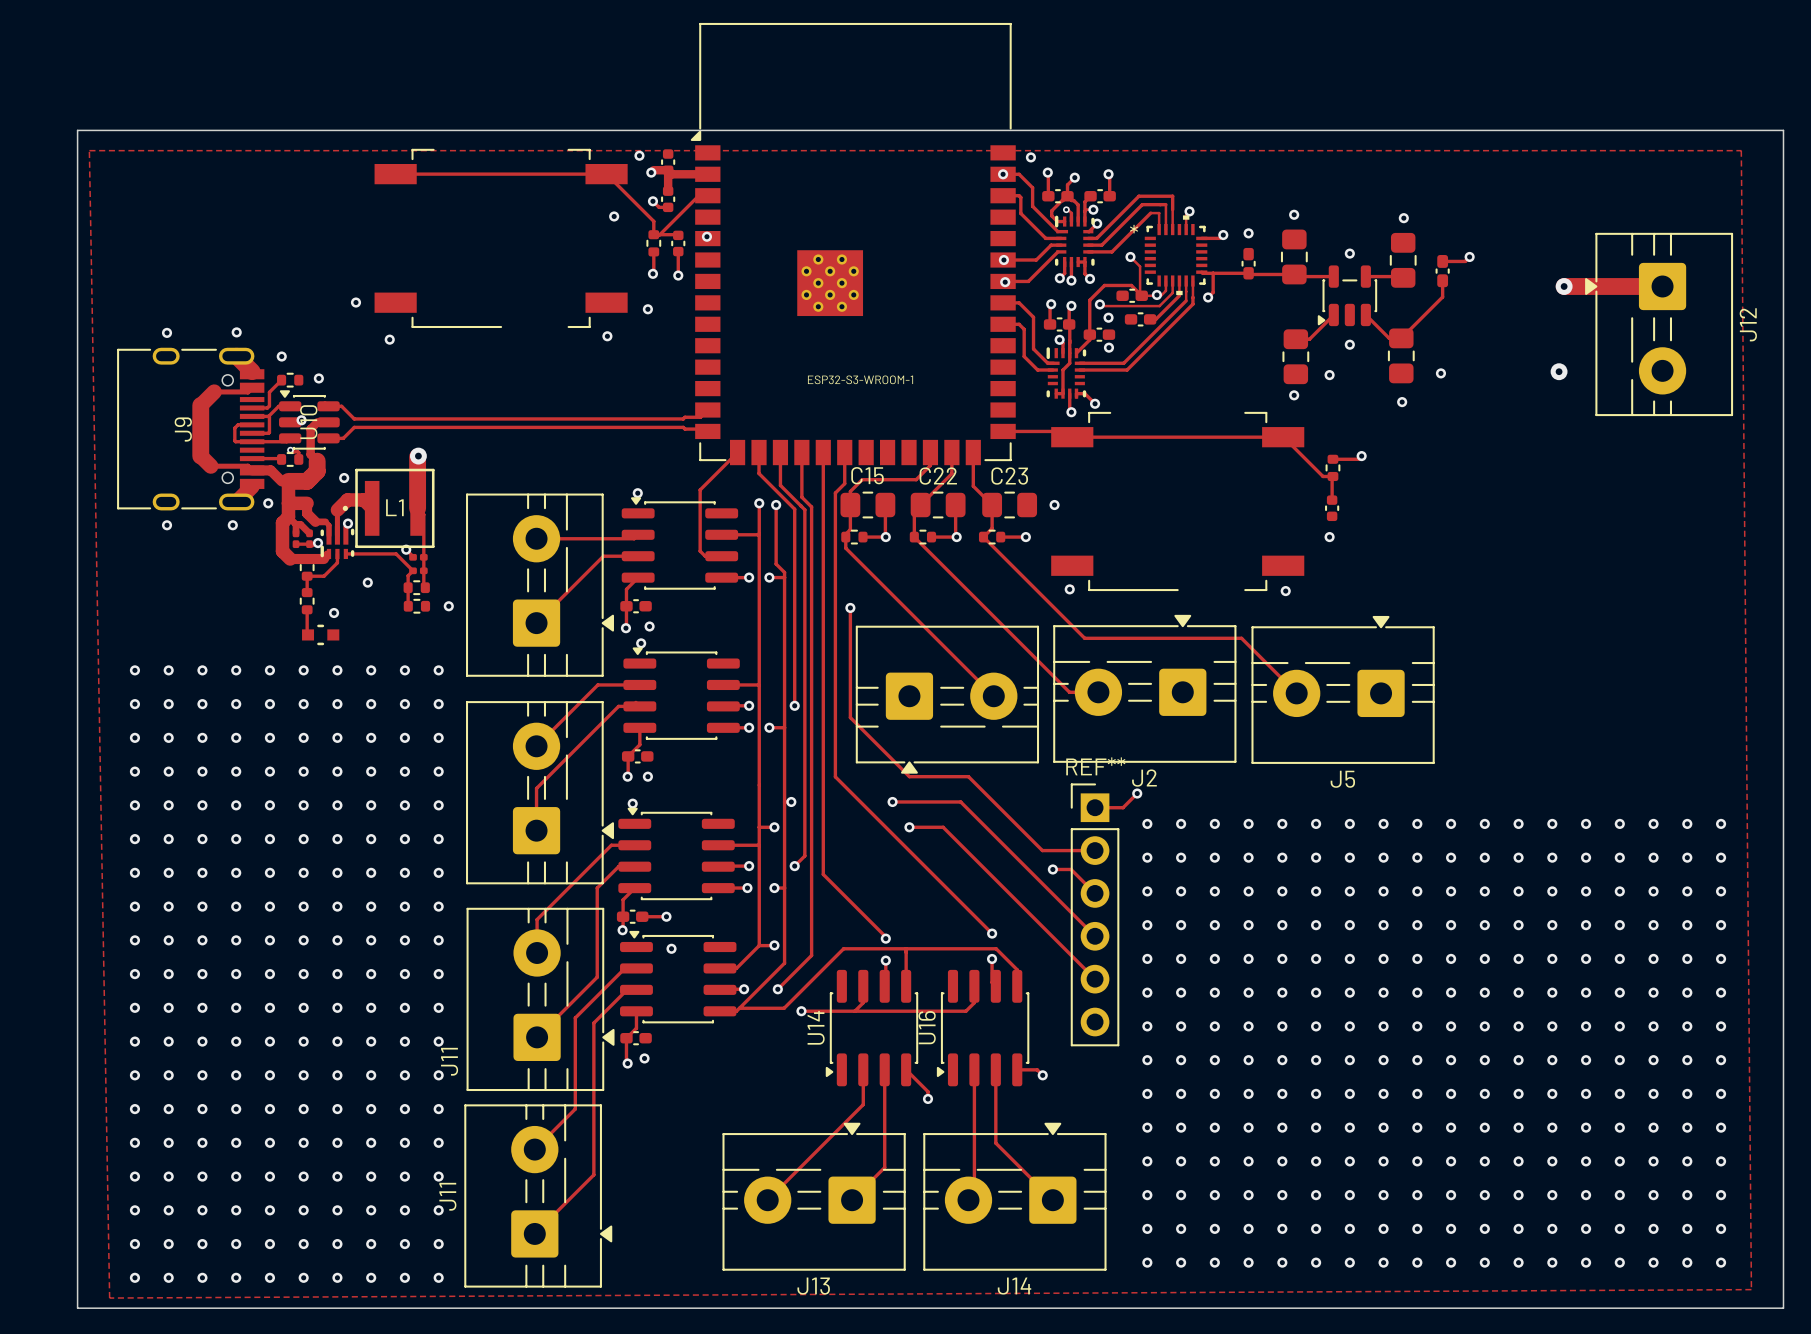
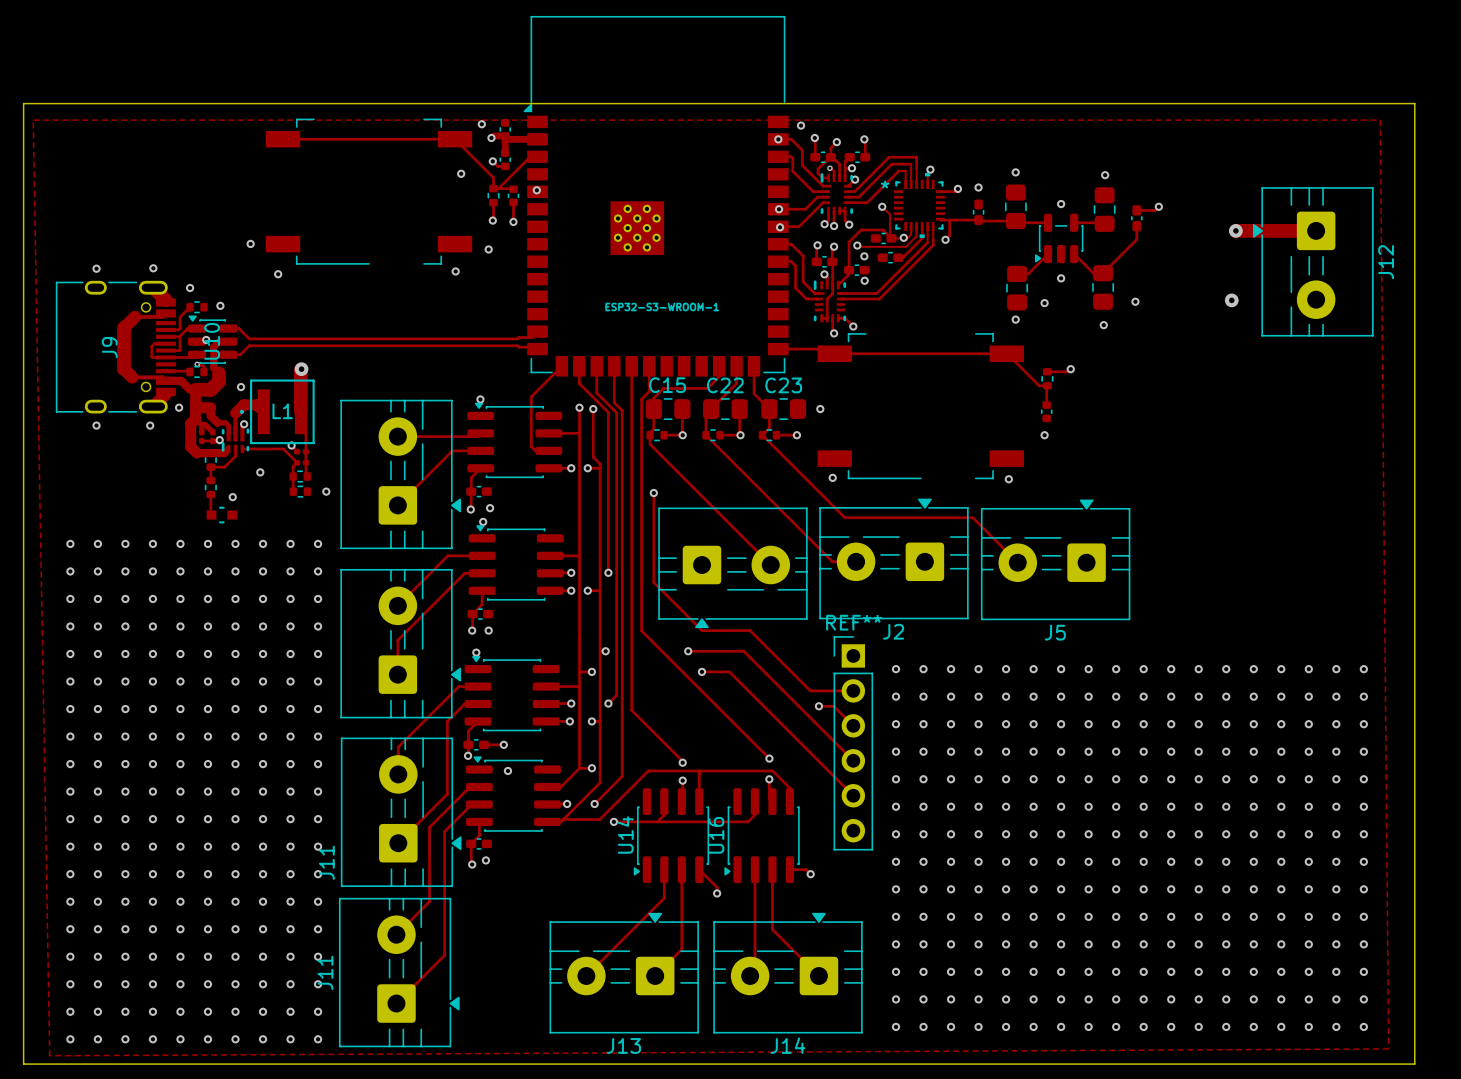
track: (1137, 793) (1123, 807) (1095, 807) -> none
via: (1137, 793) -> none

